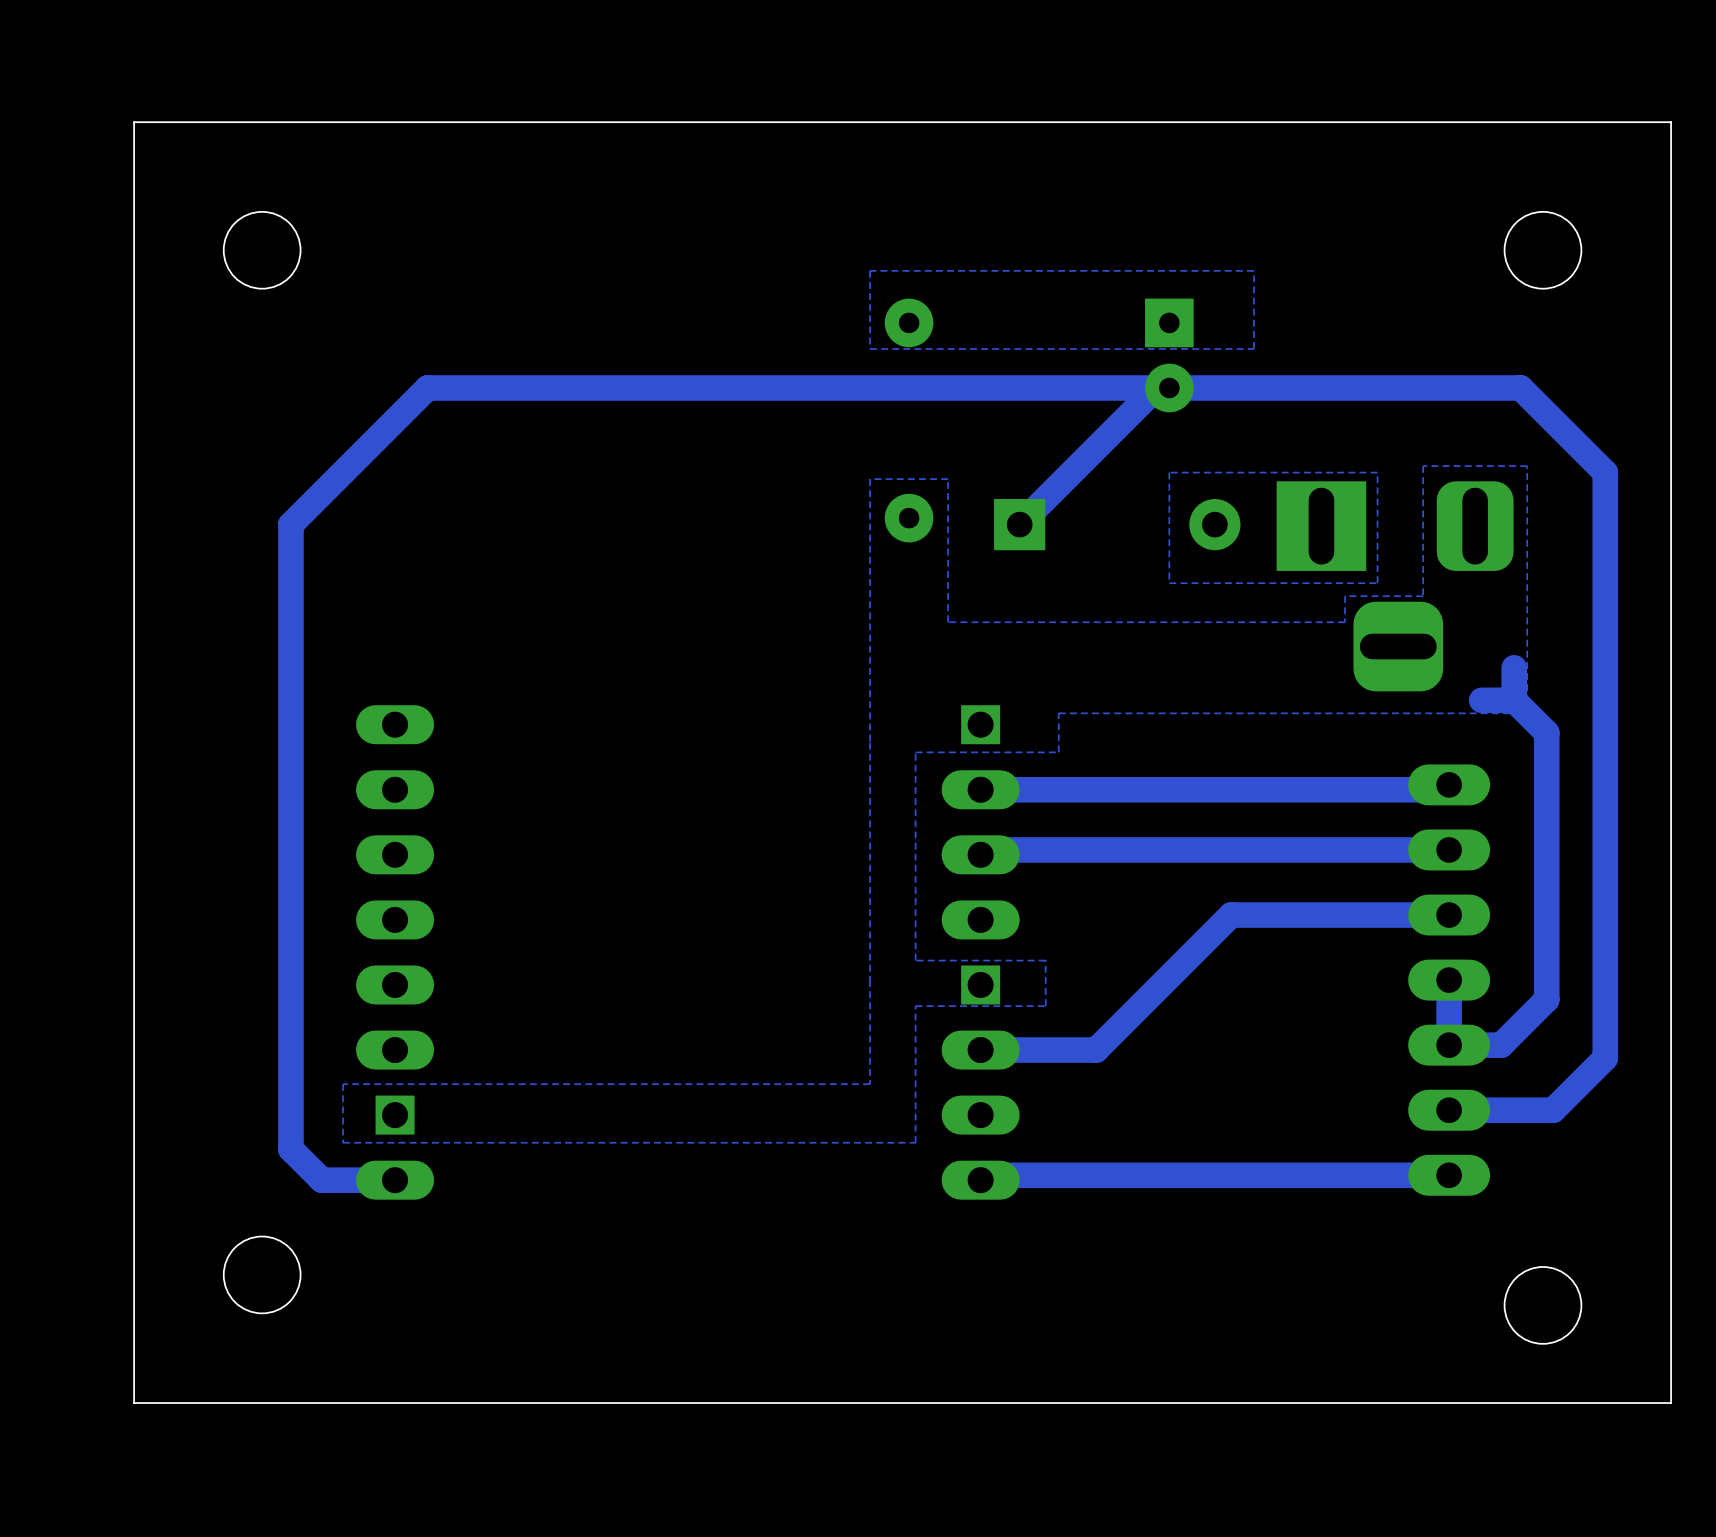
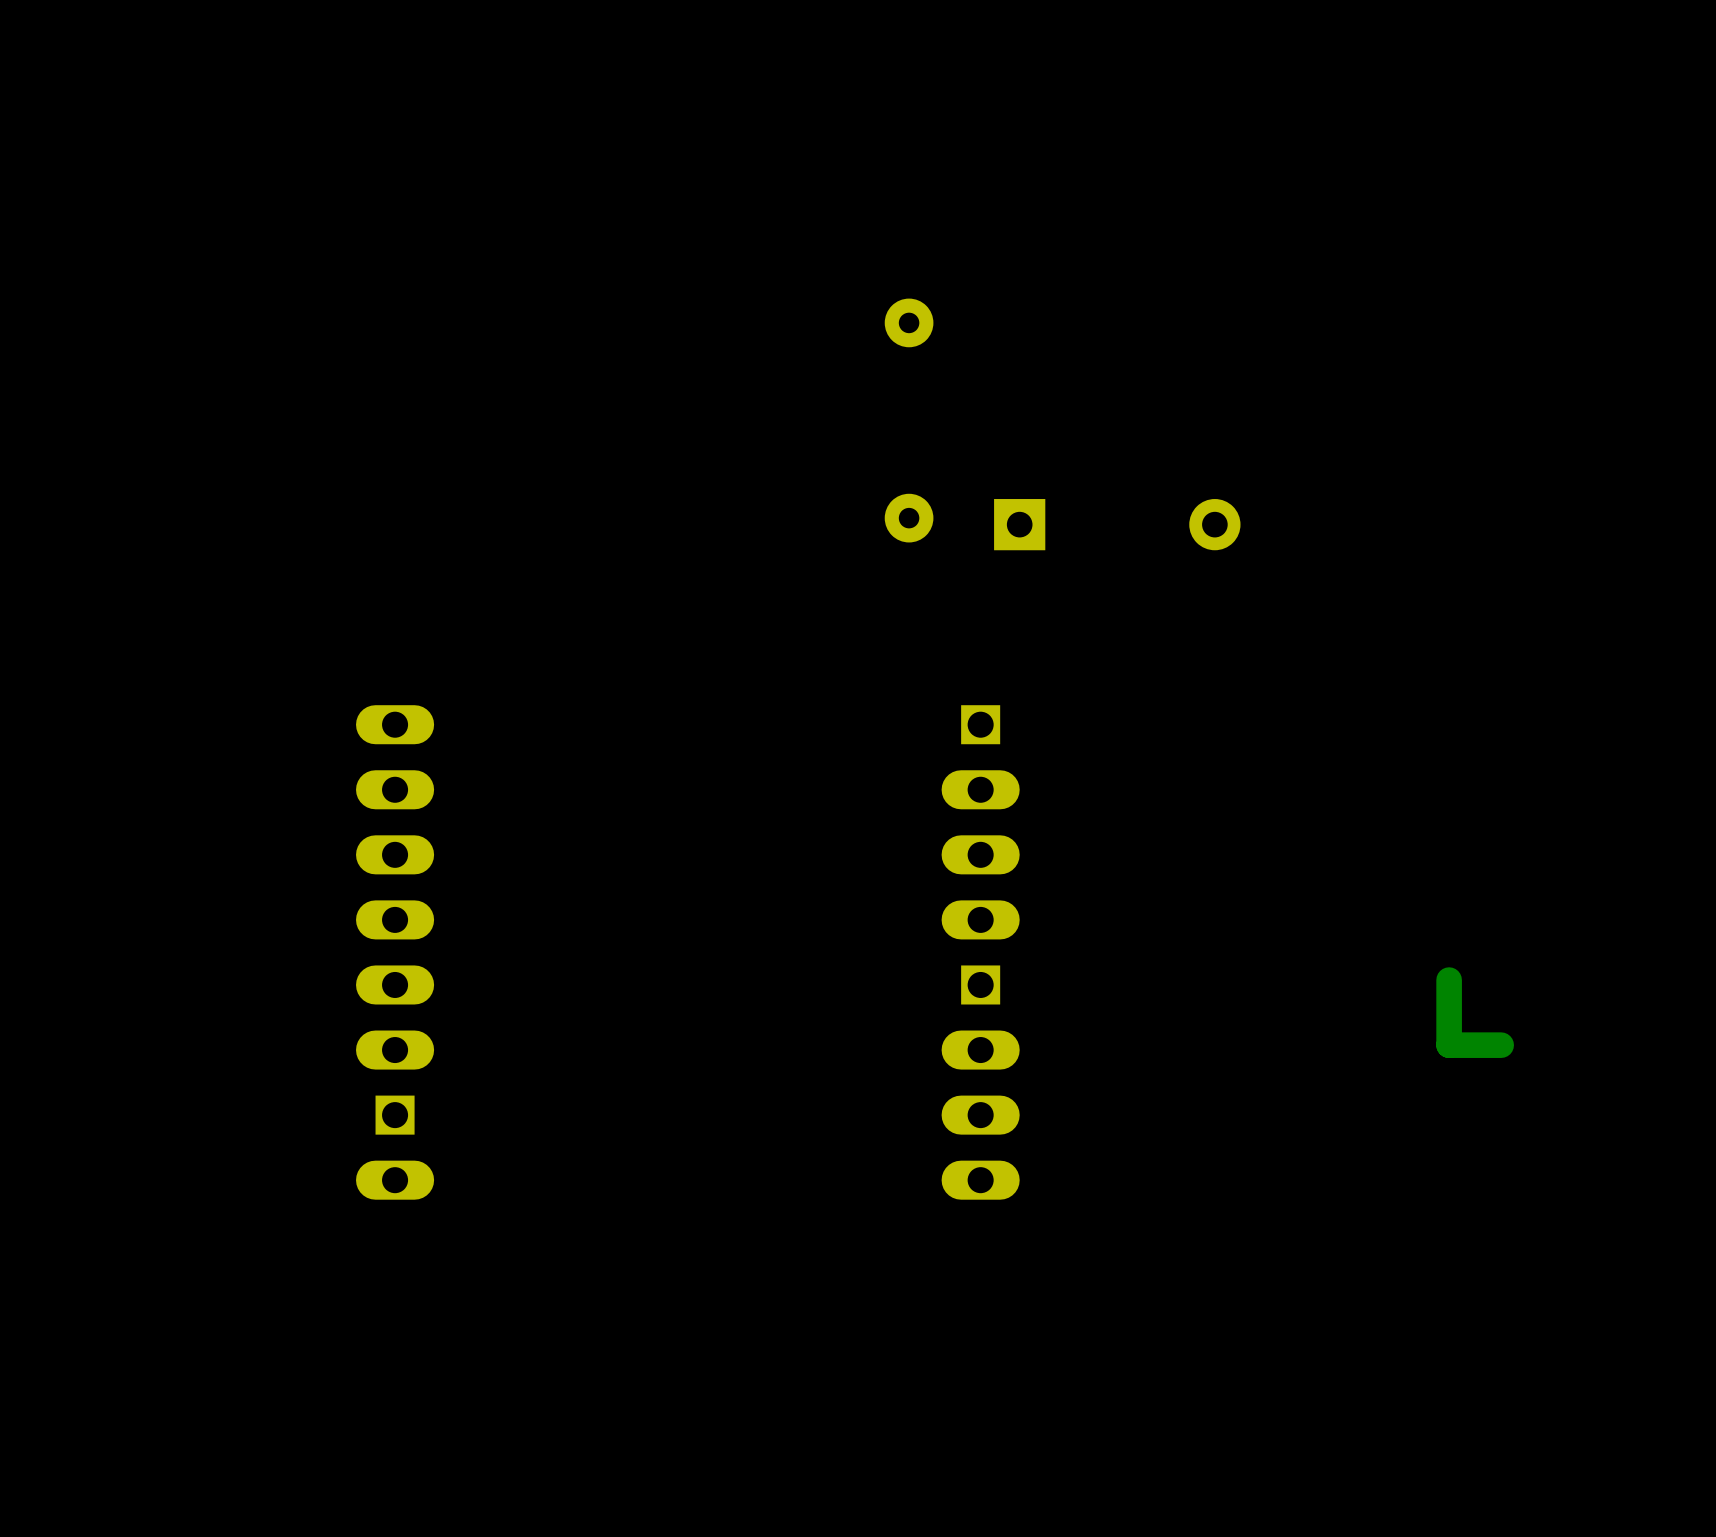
board edge: (1671, 122) (134, 122) (134, 1403) (1671, 1403) (1671, 122) -> none
round board edge: [223, 211, 302, 290] -> none
round board edge: [1503, 211, 1583, 290] -> none
bottom zone outline: (1253, 270) (870, 270) (870, 348) (1253, 348) (1253, 270) -> none
part: (1169, 355) -> none
bottom track: (1156, 387) (1019, 524) -> none
bottom zone outline: (1527, 466) (1423, 466) (1423, 596) (1345, 596) (1345, 622) (948, 622) (948, 479) (870, 479) (870, 1084) (343, 1084) (343, 1142) (915, 1142) (915, 1006) (1045, 1006) (1045, 960) (915, 960) (915, 752) (1058, 752) (1058, 713) (1527, 713) (1527, 466) -> none
bottom zone outline: (1377, 472) (1377, 583) (1169, 583) (1169, 472) (1377, 472) -> none
part: (1395, 586) -> none
bottom track: (1514, 667) (1514, 700) -> none
bottom track: (1514, 700) (1481, 700) -> none
bottom track: (1514, 700) (1546, 732) (1546, 999) (1501, 1045) (1533, 1012) -> none
bottom track: (1449, 784) (1444, 789) (980, 789) -> none
bottom track: (1449, 849) (985, 849) -> none
bottom track: (1449, 915) (1231, 915) (1096, 1050) (980, 1050) -> none
part: (1449, 980) -> none
bottom track: (1449, 1110) (1553, 1110) (1605, 1058) (1605, 472) (1520, 387) (427, 387) (290, 524) (290, 1149) (321, 1180) (395, 1180) -> none
bottom track: (1449, 1175) (985, 1175) -> none
round board edge: [223, 1235, 302, 1315] -> none
round board edge: [1503, 1266, 1583, 1345] -> none

